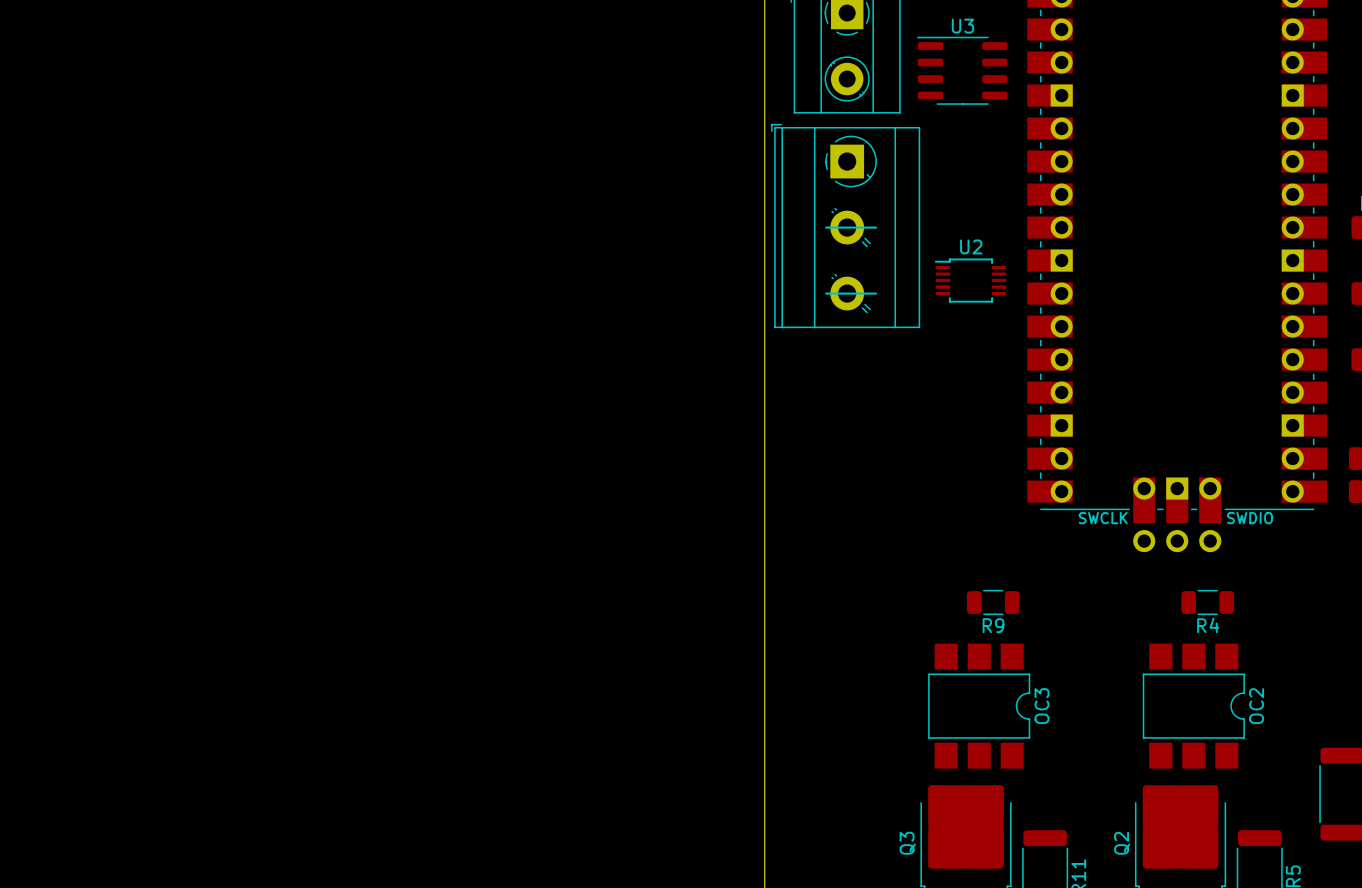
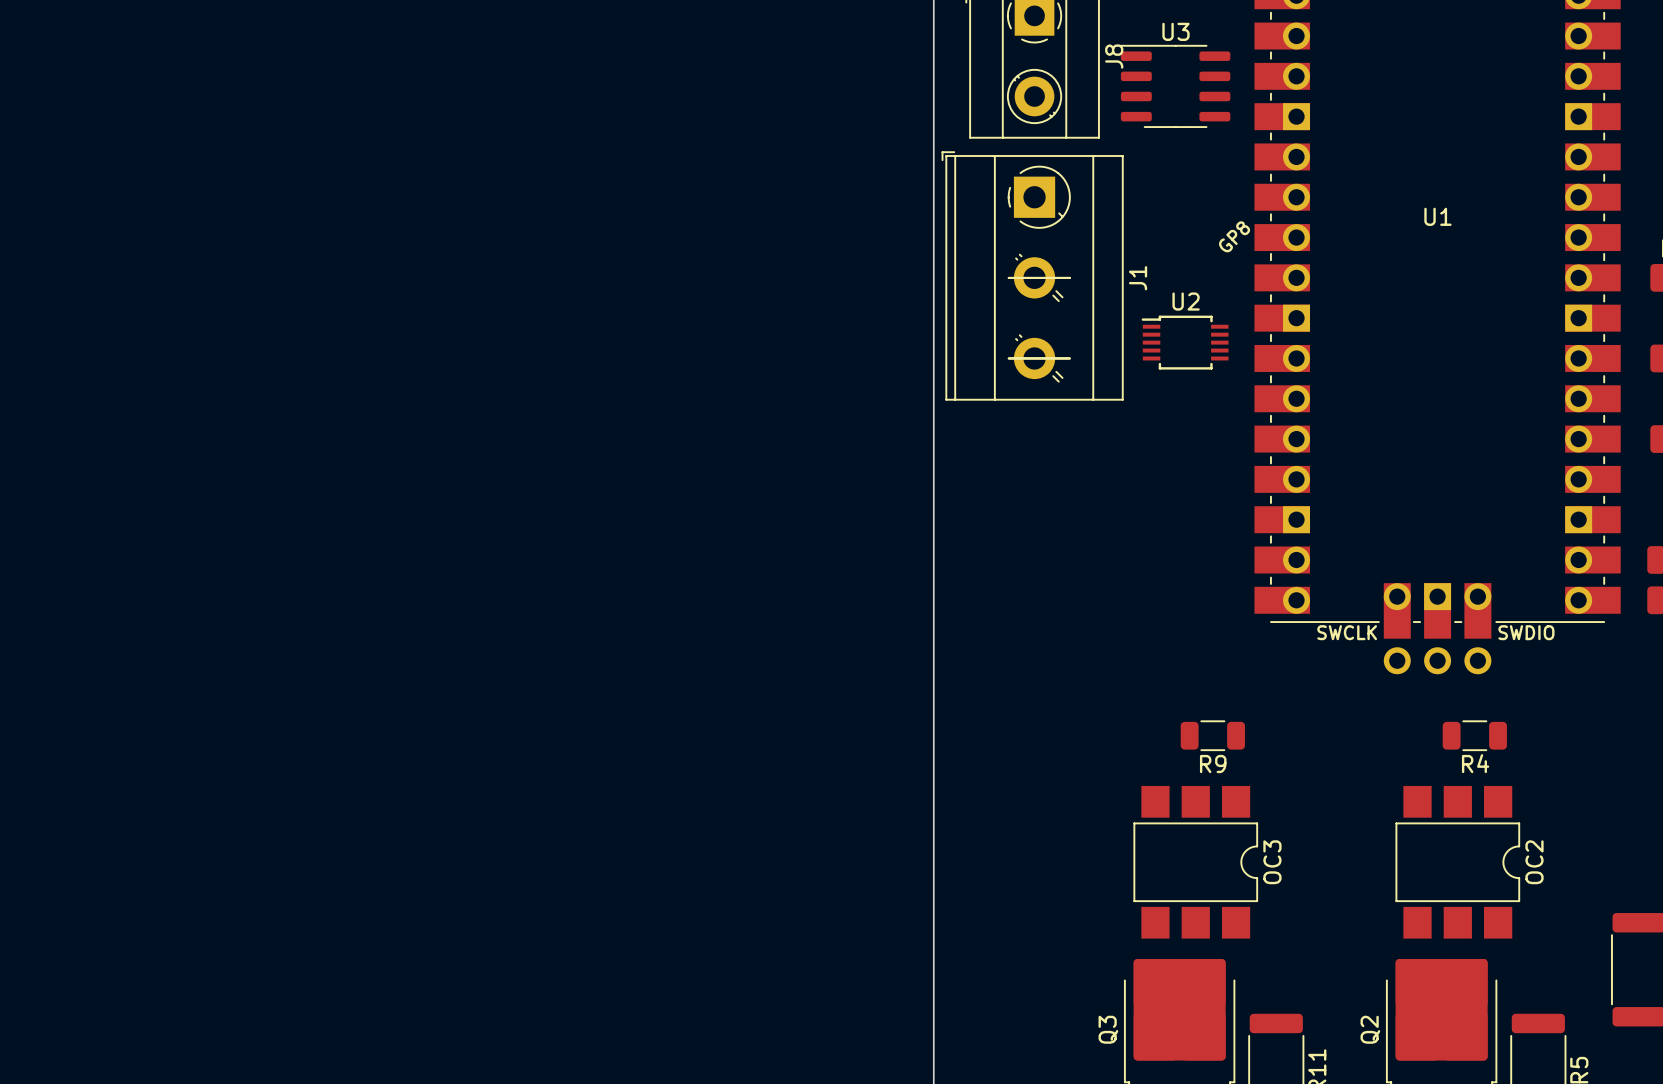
J8 name: none -> J8 (1114, 56)
U1 name: none -> U1 (1437, 216)
U1 text: none -> GP8 (1234, 236)
J1 name: none -> J1 (1138, 278)

